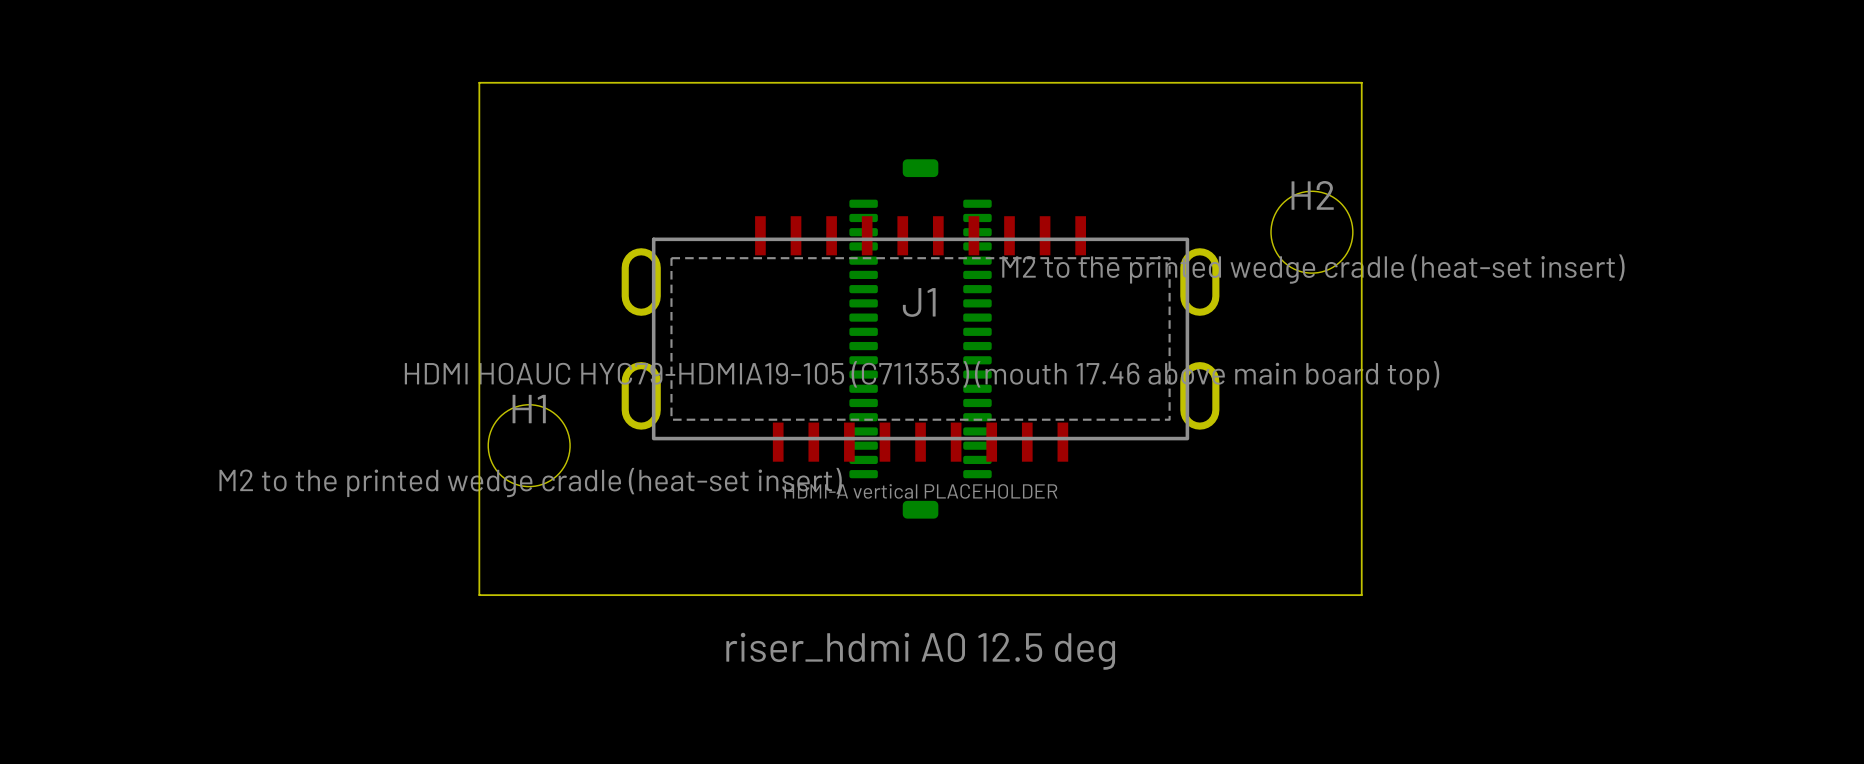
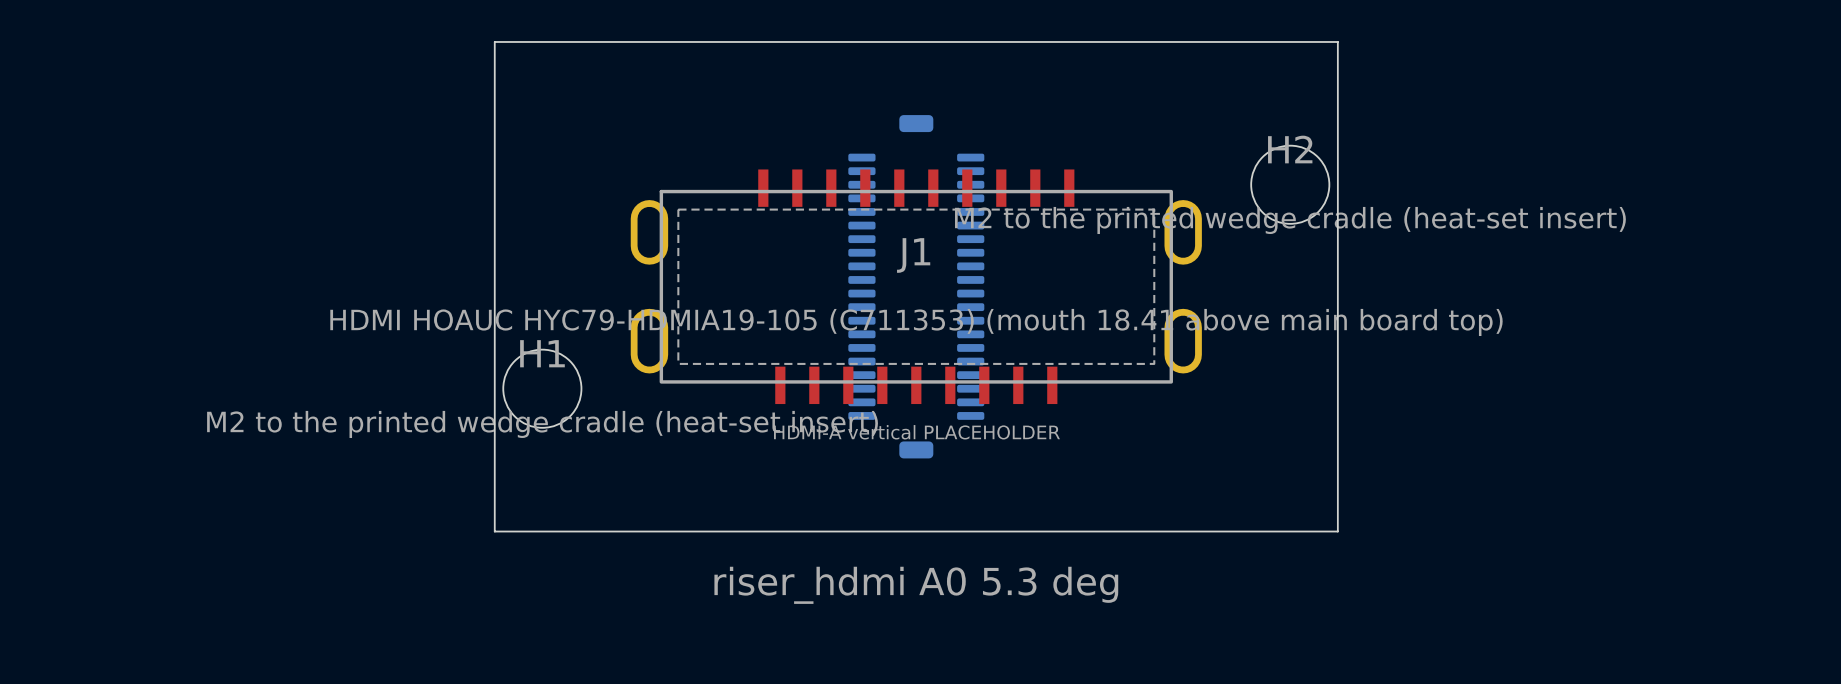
J1 value: HDMI HOAUC HYC79-HDMIA19-105 (C711353) (mouth 17.46 above main board top) (922, 375) -> HDMI HOAUC HYC79-HDMIA19-105 (C711353) (mouth 18.41 above main board top) (916, 322)
text: riser_hdmi A0 12.5 deg (920, 651) -> riser_hdmi A0 5.3 deg (916, 585)

